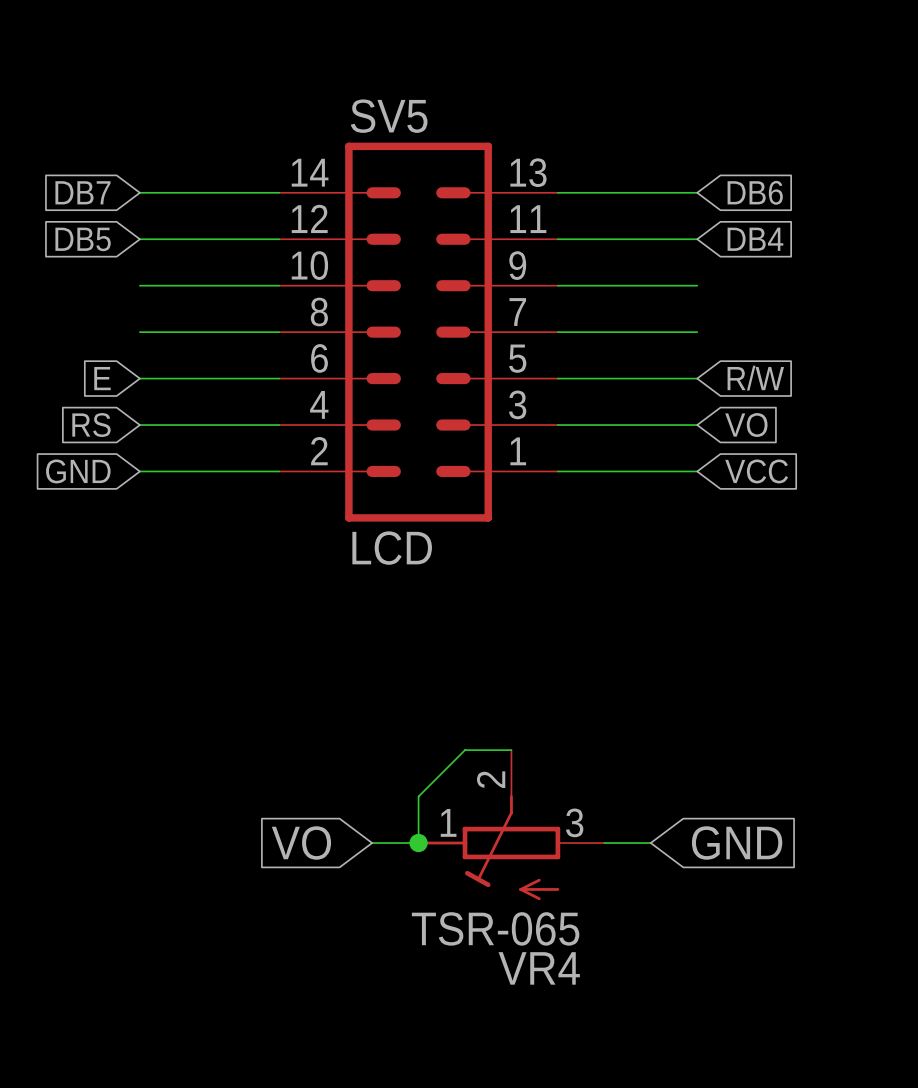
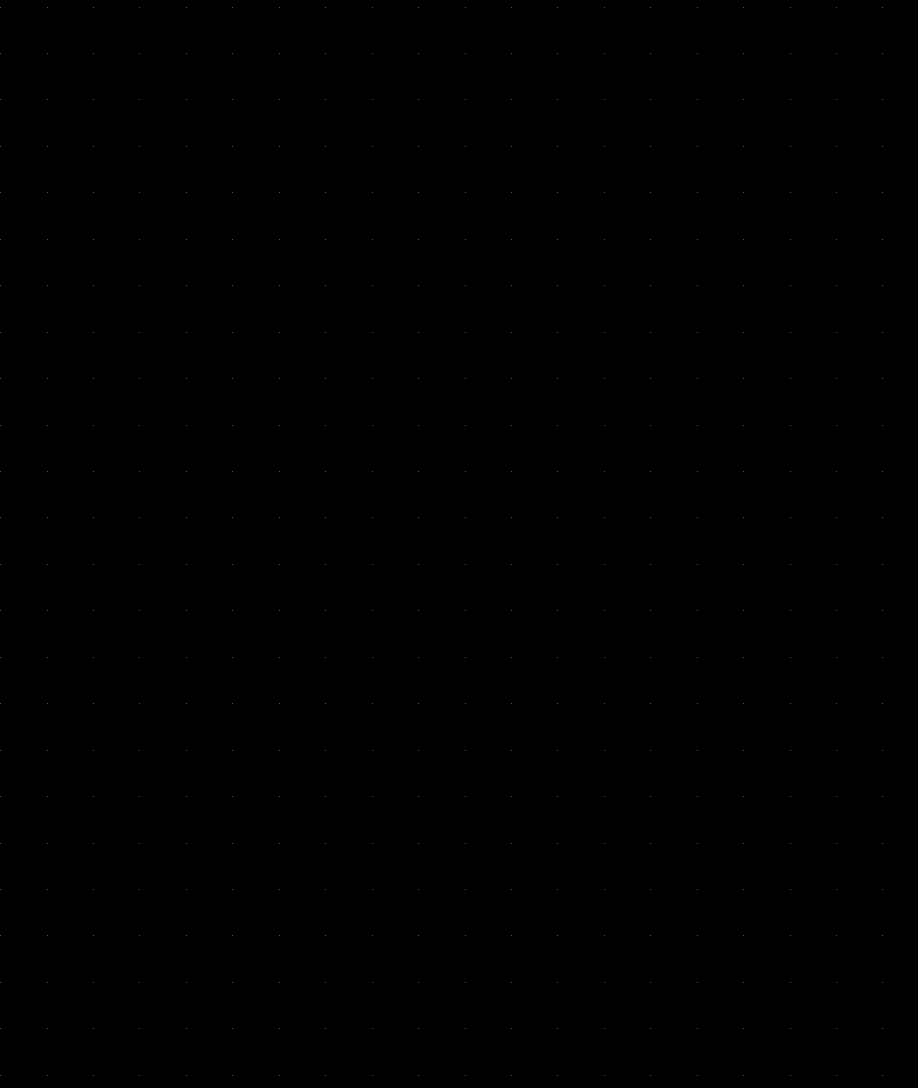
global label: DB7 (82, 192) -> none
wire: (139, 192) (279, 192) -> none
wire: (557, 192) (697, 192) -> none
global label: DB6 (755, 192) -> none
global label: DB5 (83, 239) -> none
wire: (139, 239) (279, 239) -> none
wire: (557, 239) (697, 239) -> none
global label: DB4 (755, 239) -> none
wire: (139, 285) (279, 285) -> none
wire: (557, 285) (697, 285) -> none
wire: (139, 332) (279, 332) -> none
SV5: LCD (418, 332) -> none
wire: (557, 332) (697, 332) -> none
global label: E (102, 378) -> none
wire: (139, 378) (279, 378) -> none
wire: (557, 378) (697, 378) -> none
global label: R/W (755, 378) -> none
global label: RS (91, 425) -> none
wire: (139, 425) (279, 425) -> none
wire: (557, 425) (697, 425) -> none
global label: VO (746, 425) -> none
global label: GND (78, 471) -> none
wire: (139, 471) (279, 471) -> none
wire: (557, 471) (697, 471) -> none
global label: VCC (756, 471) -> none
wire: (511, 750) (465, 750) (418, 796) (418, 843) (372, 843) -> none
VR4: TSR-065 (510, 825) -> none
global label: VO (301, 843) -> none
junction: (418, 843) -> none
wire: (604, 843) (650, 843) -> none
global label: GND (737, 843) -> none

